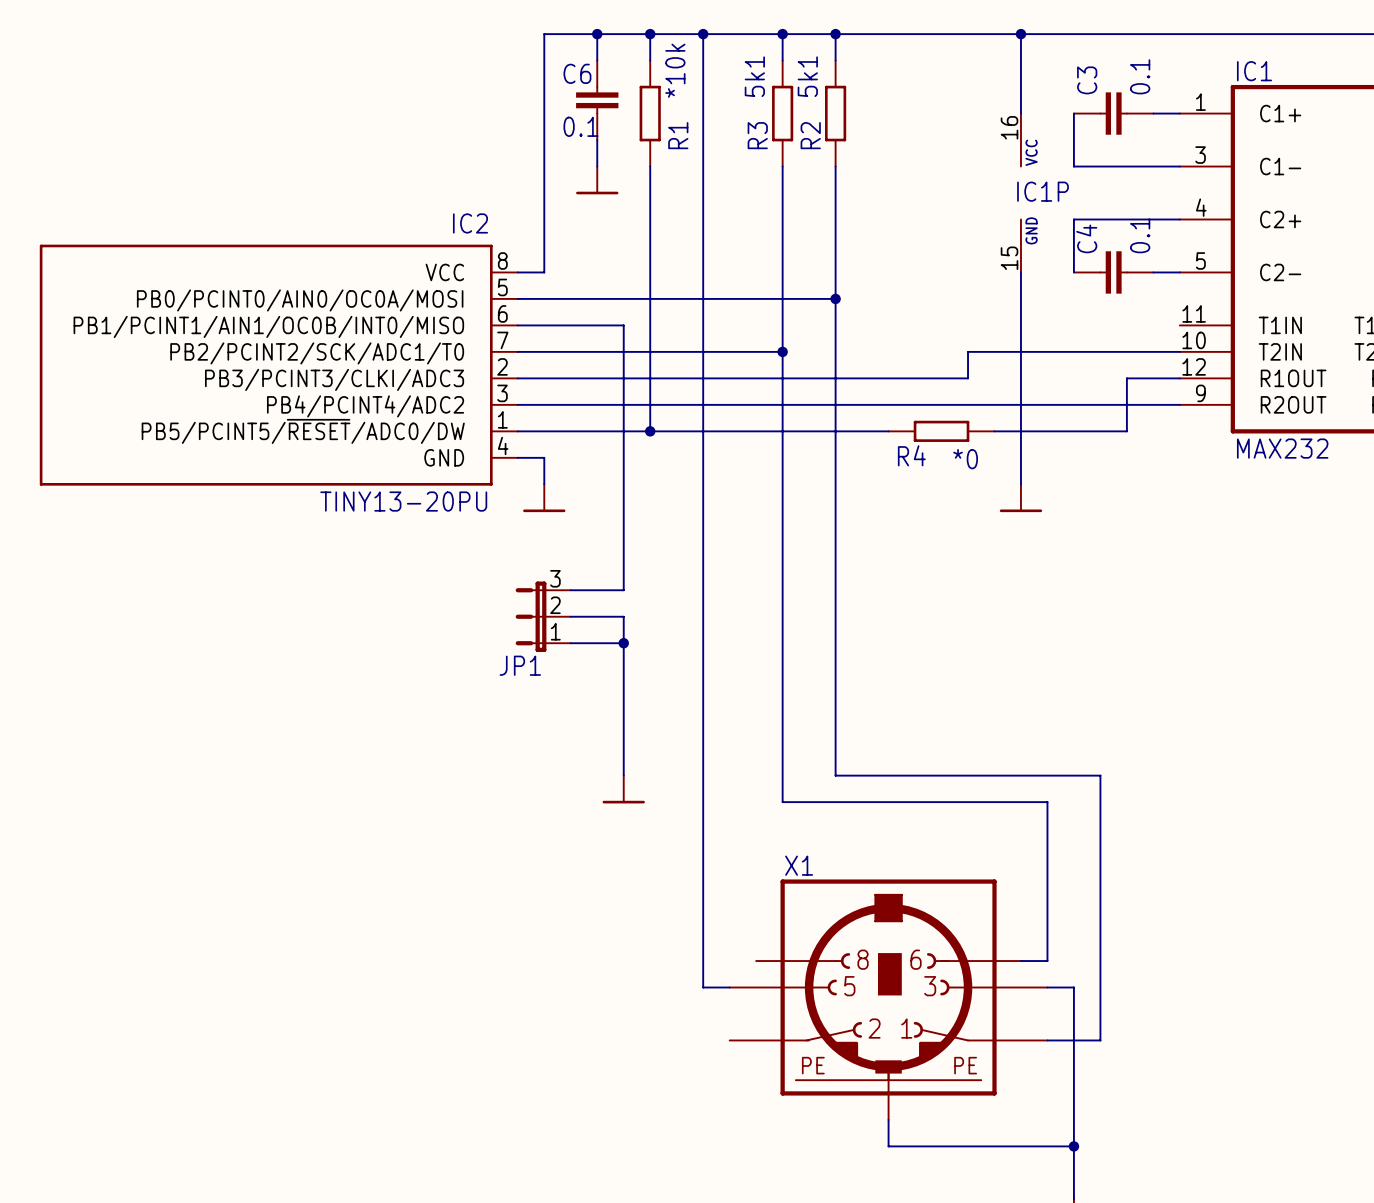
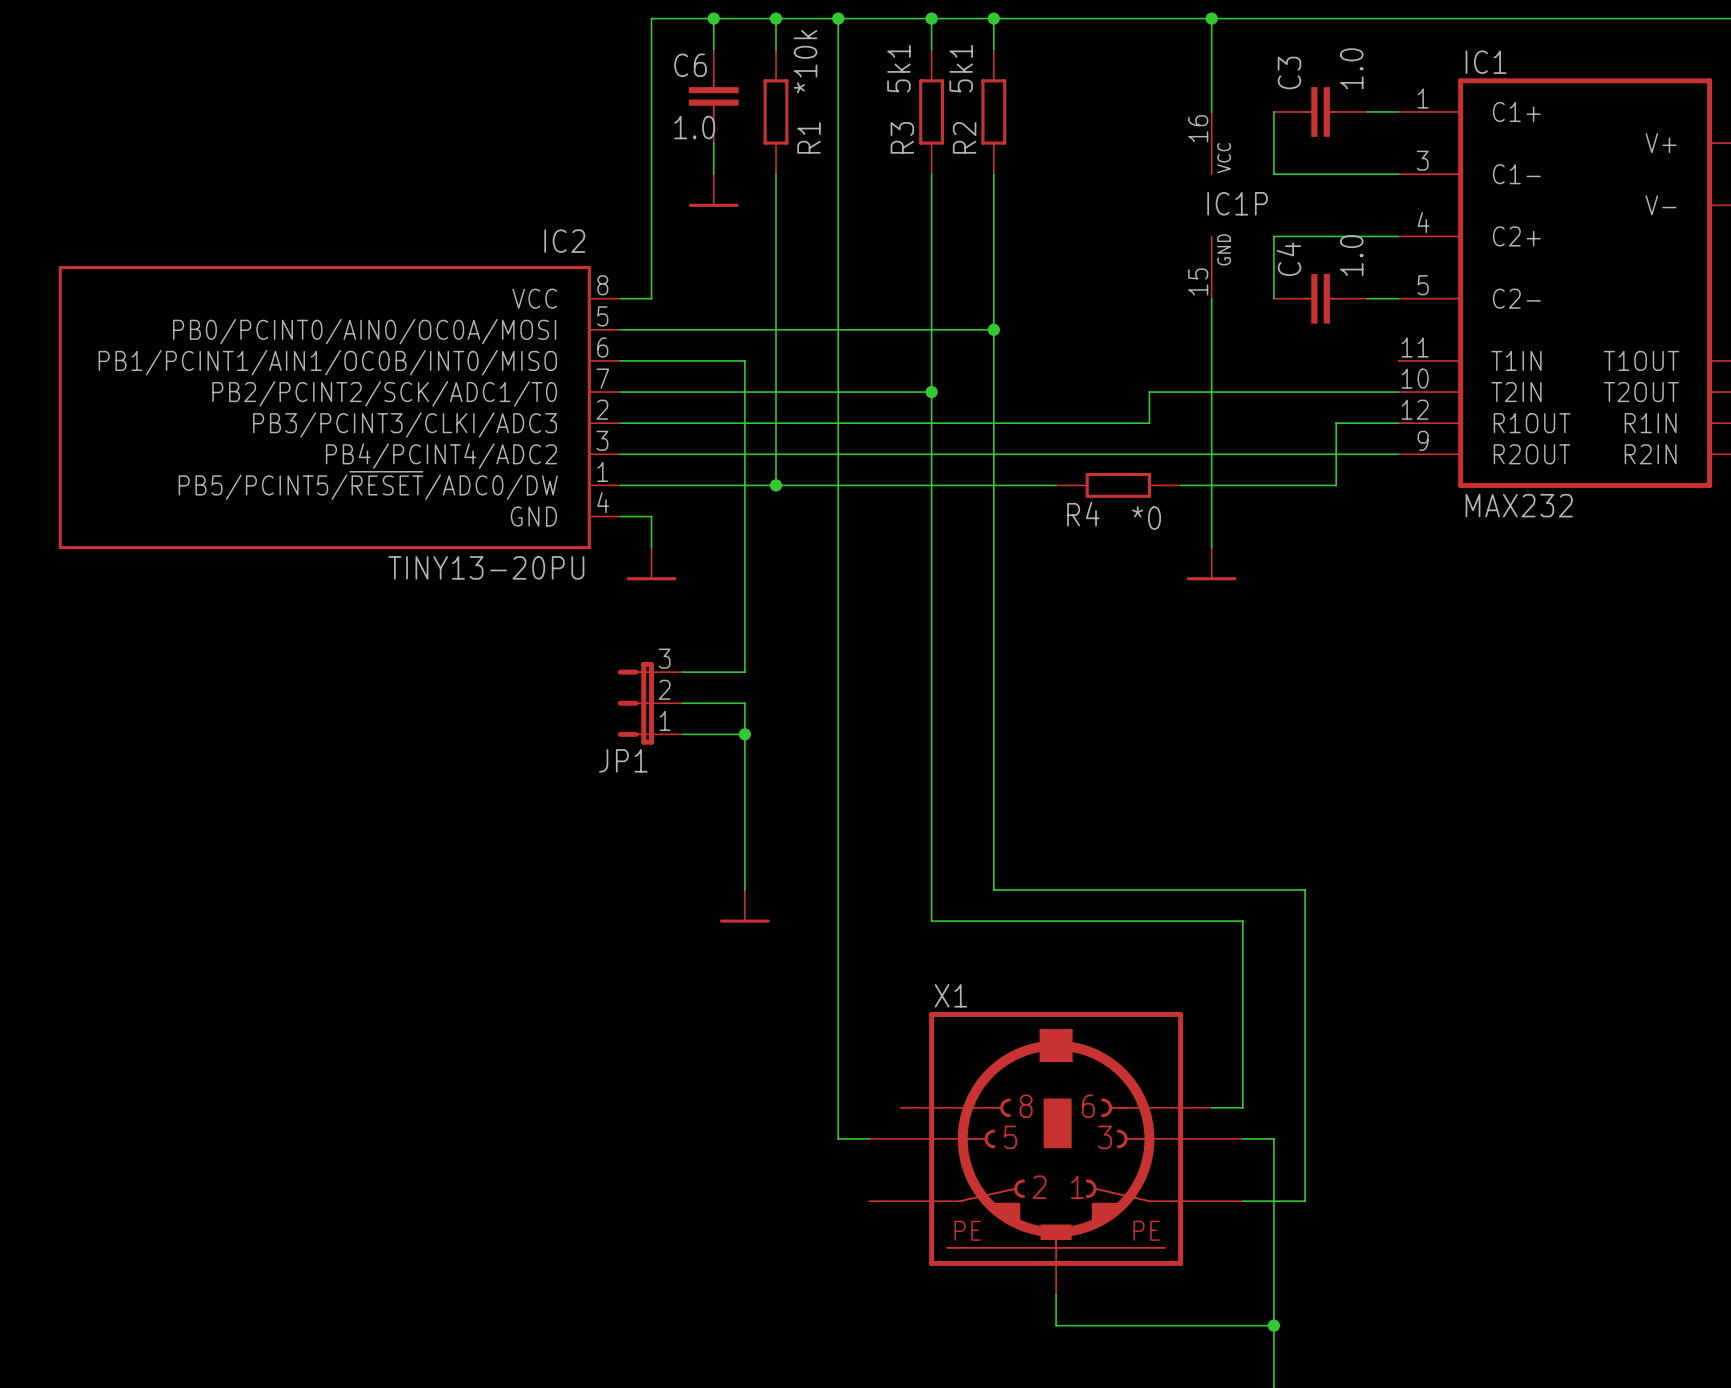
C3 value: 0.1 (1140, 76) -> 1.0 (1351, 68)
C6 value: 0.1 (581, 126) -> 1.0 (694, 127)
C4 value: 0.1 (1140, 235) -> 1.0 (1351, 255)

